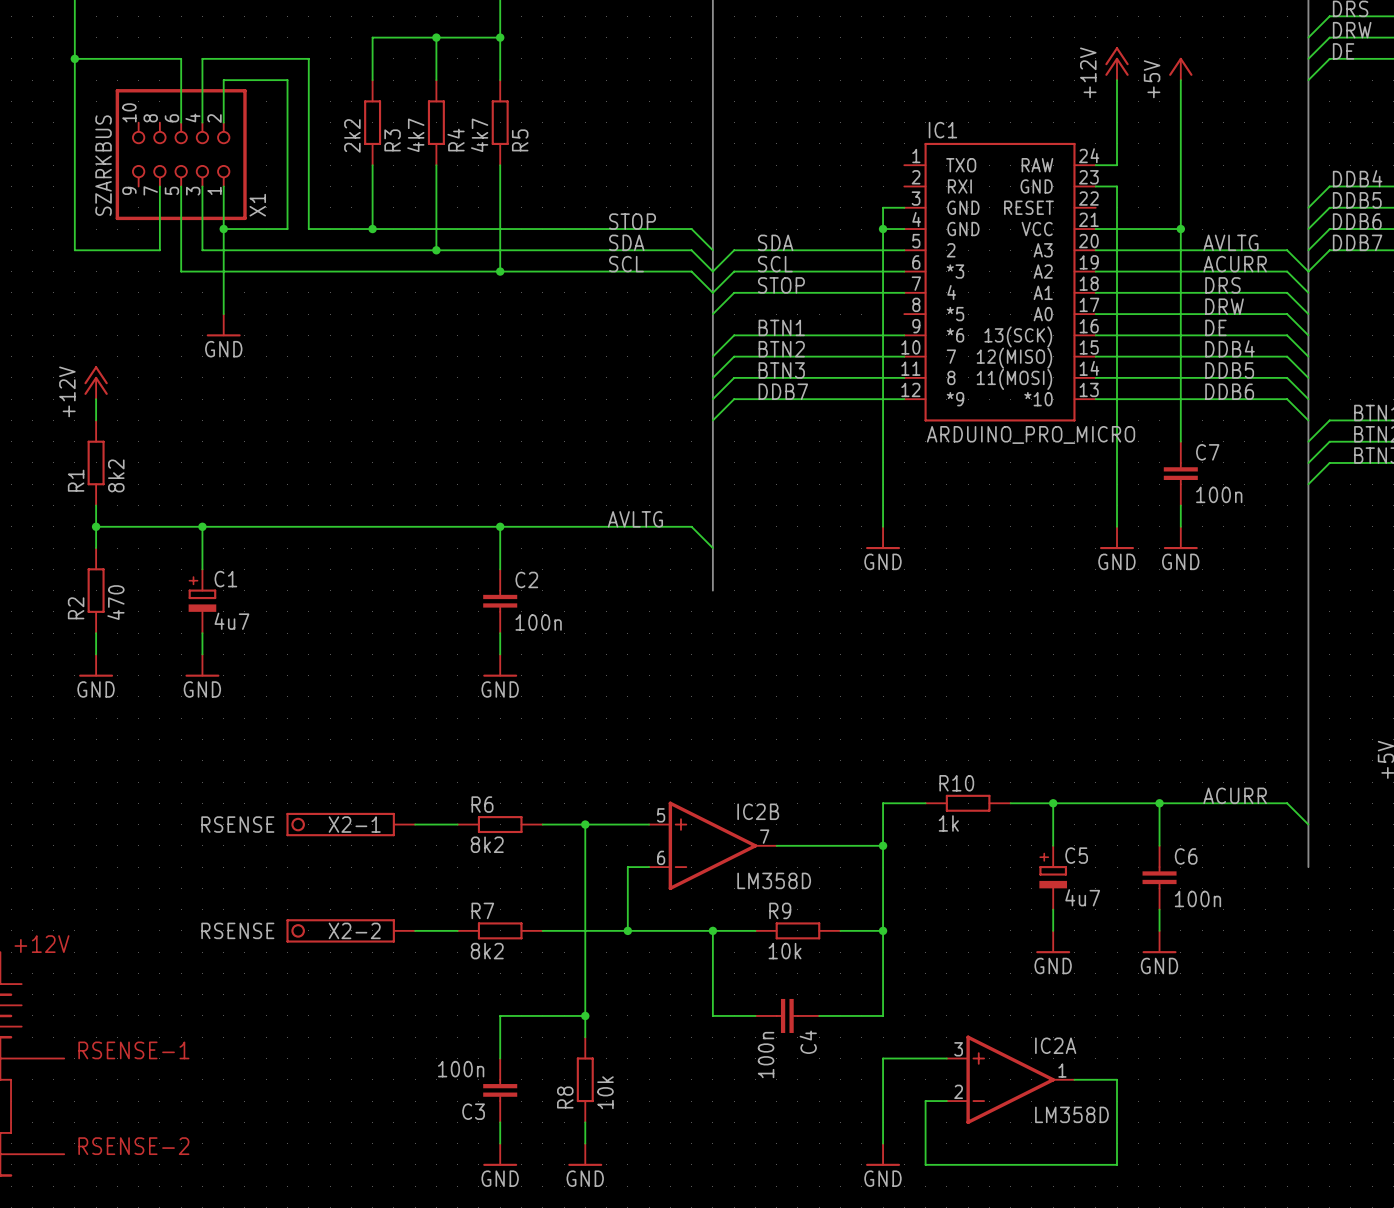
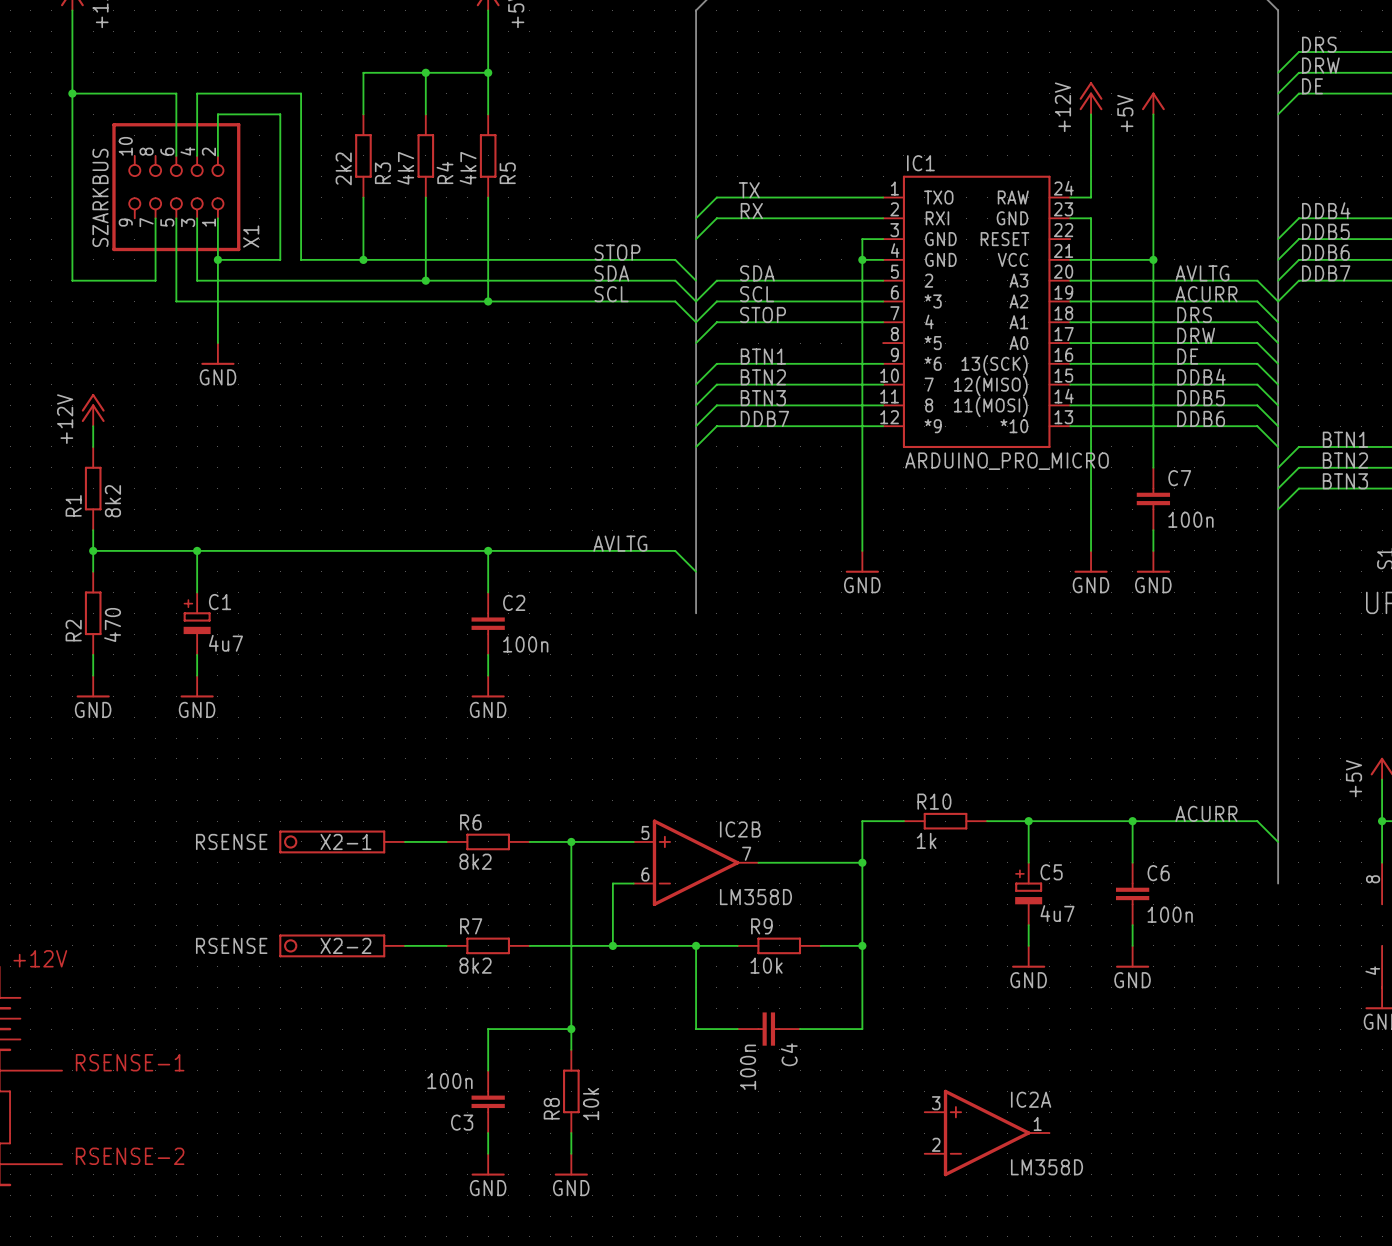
label: none -> TX (749, 190)
wire: none -> (883, 197) (716, 197) (696, 218)
label: none -> RX (751, 211)
wire: none -> (883, 218) (716, 218) (696, 239)
wire: (946, 1058) (883, 1058) (883, 1143) -> none
IC2A position: (1010, 1079) -> (987, 1133)
wire: (1074, 1079) (1117, 1079) (1117, 1164) (925, 1164) (925, 1101) (946, 1101) -> none
power symbol: GND (883, 1154) -> none

